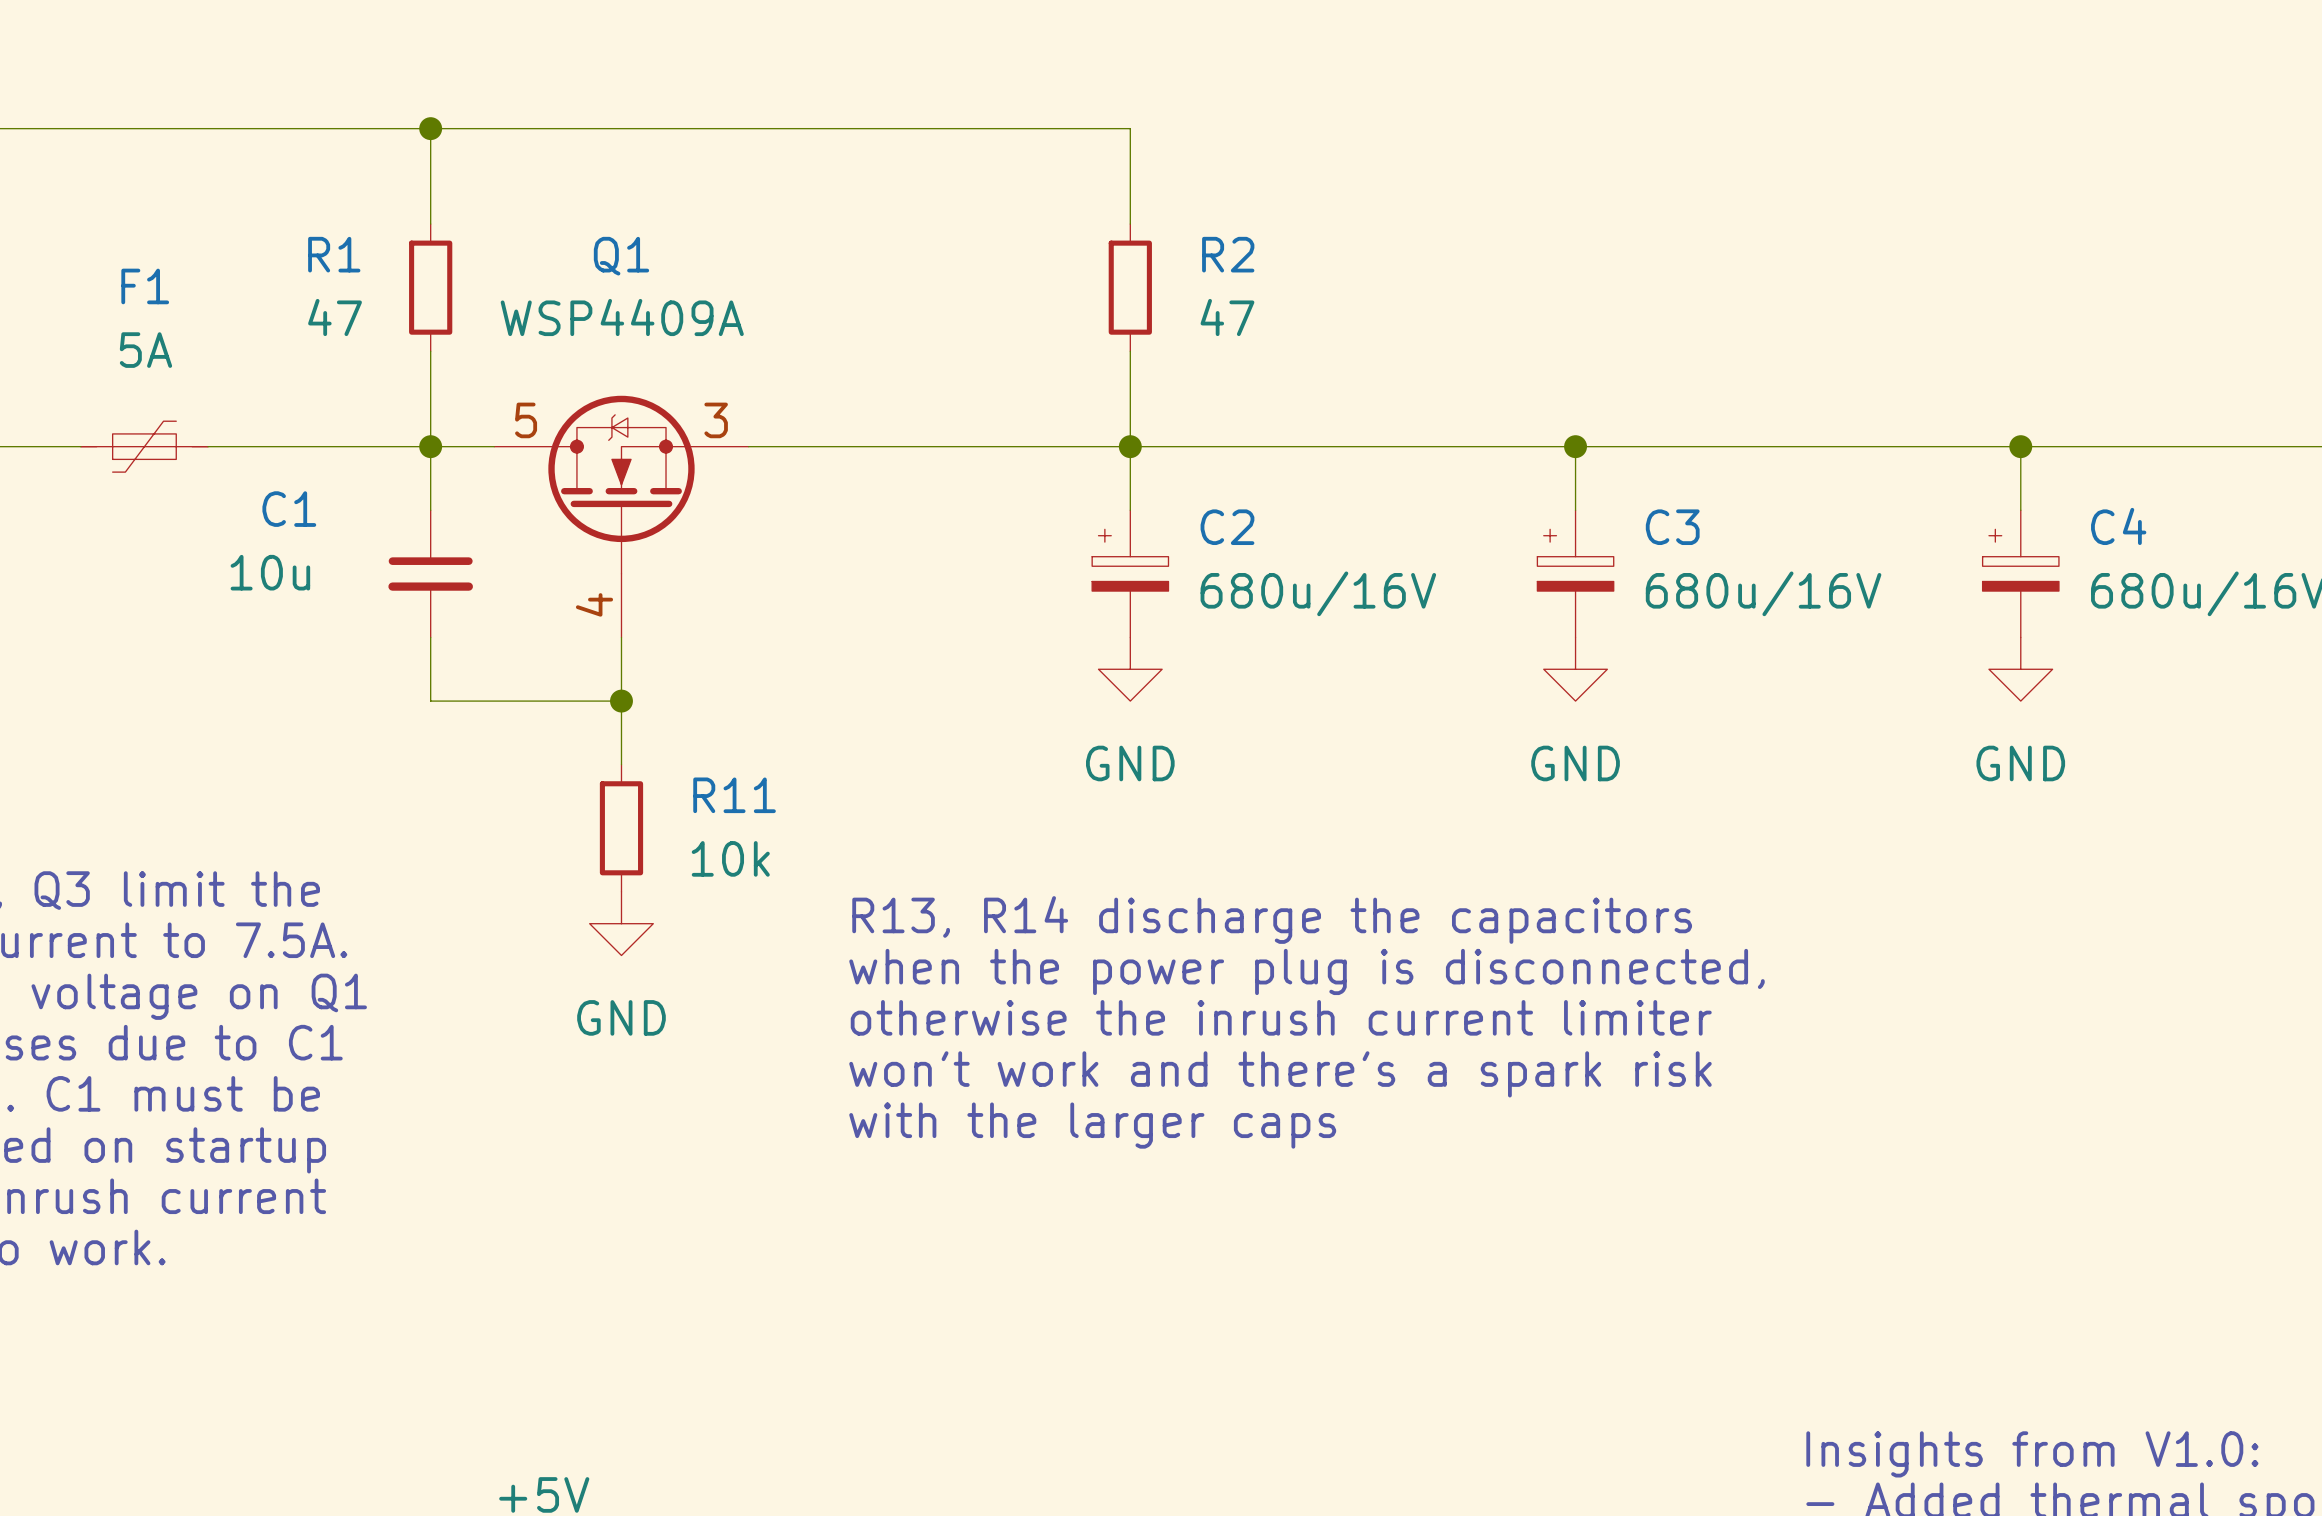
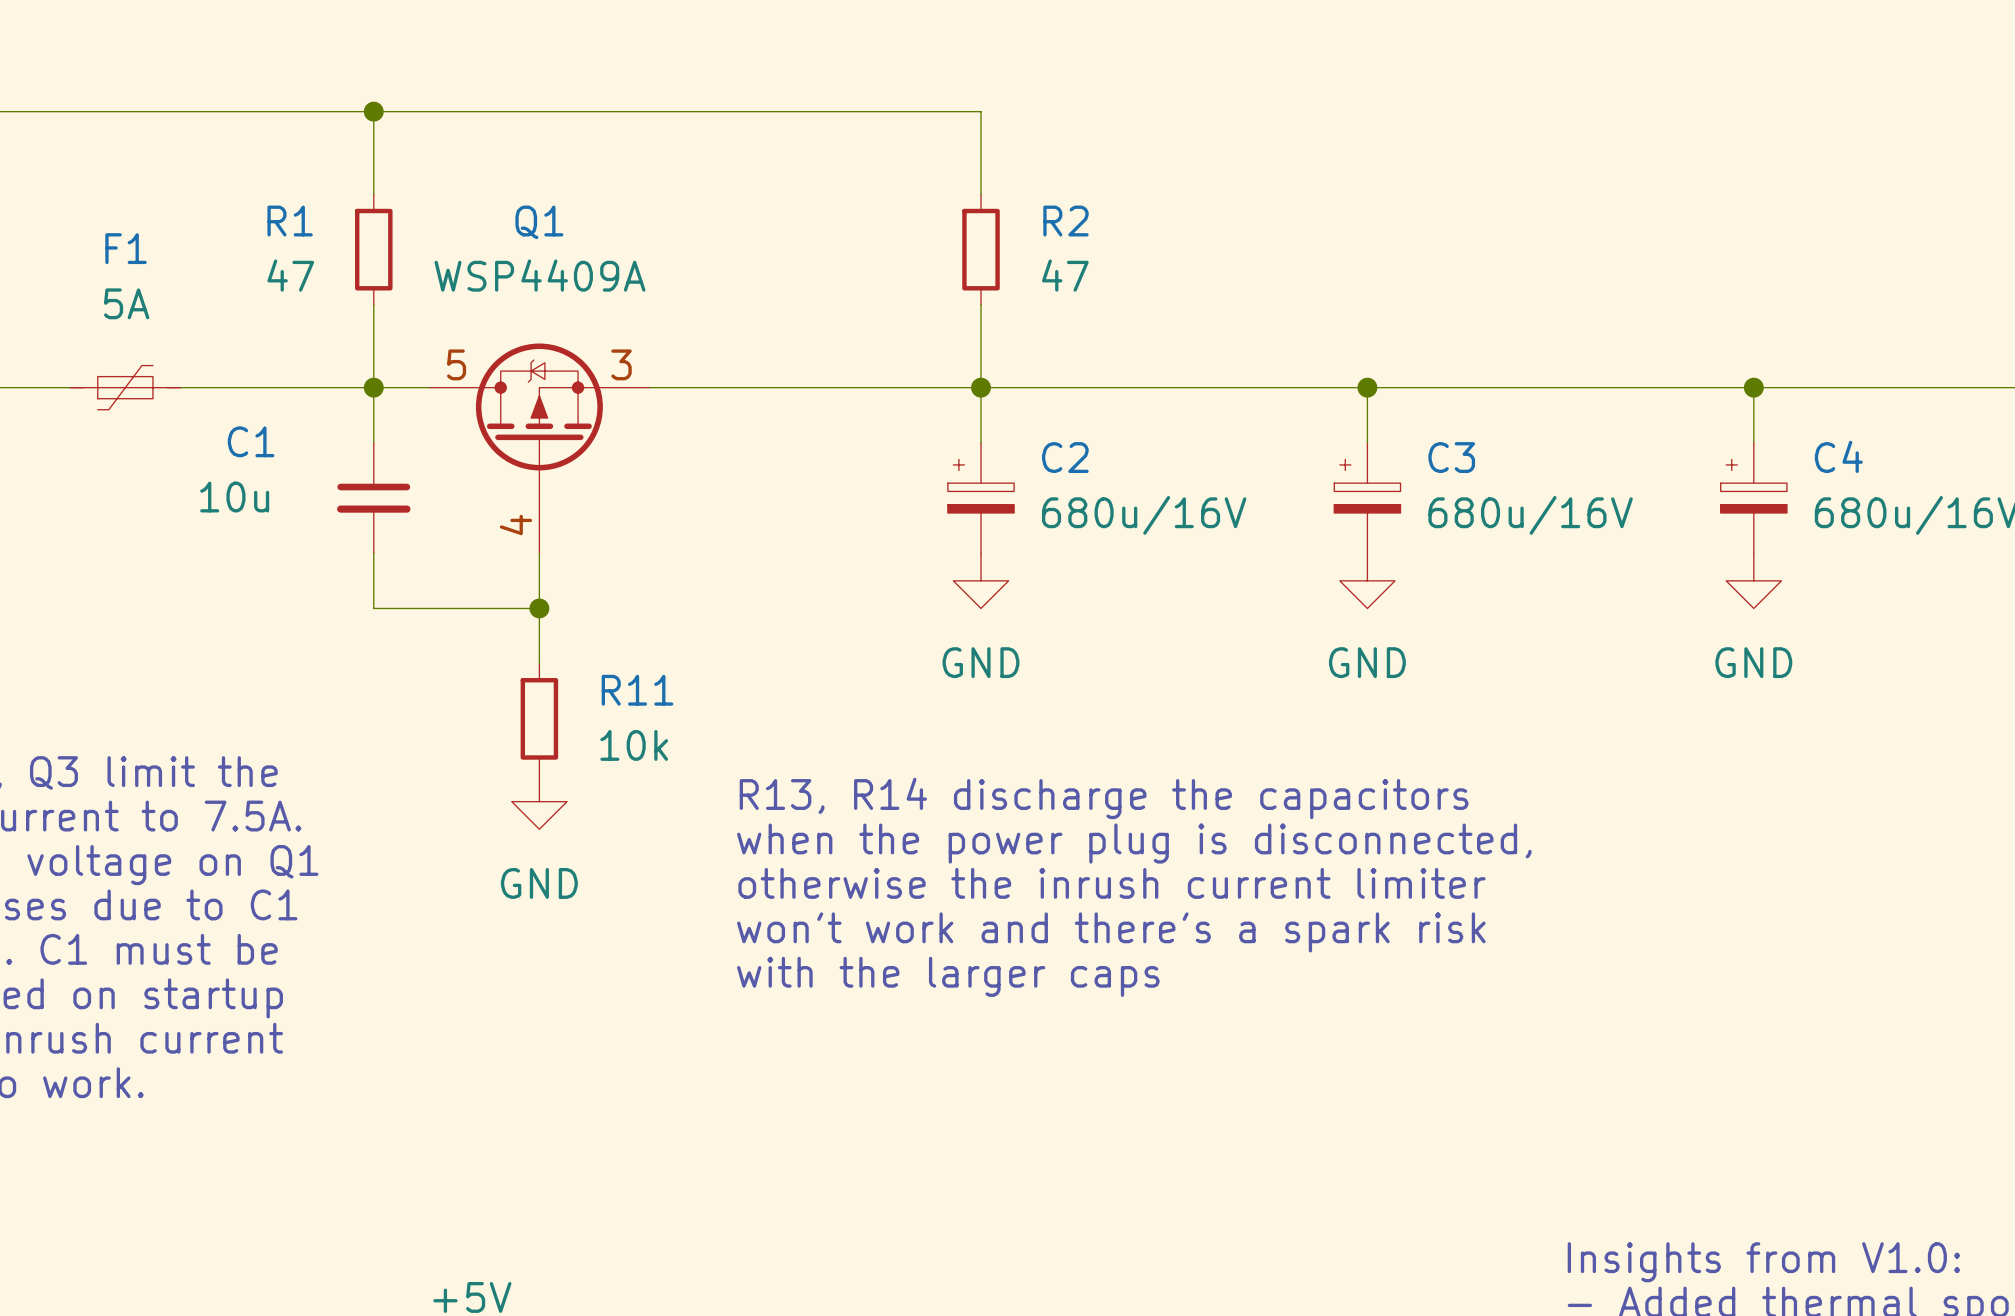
Q1 symbol: [494, 395, 749, 638] -> [428, 343, 650, 554]

